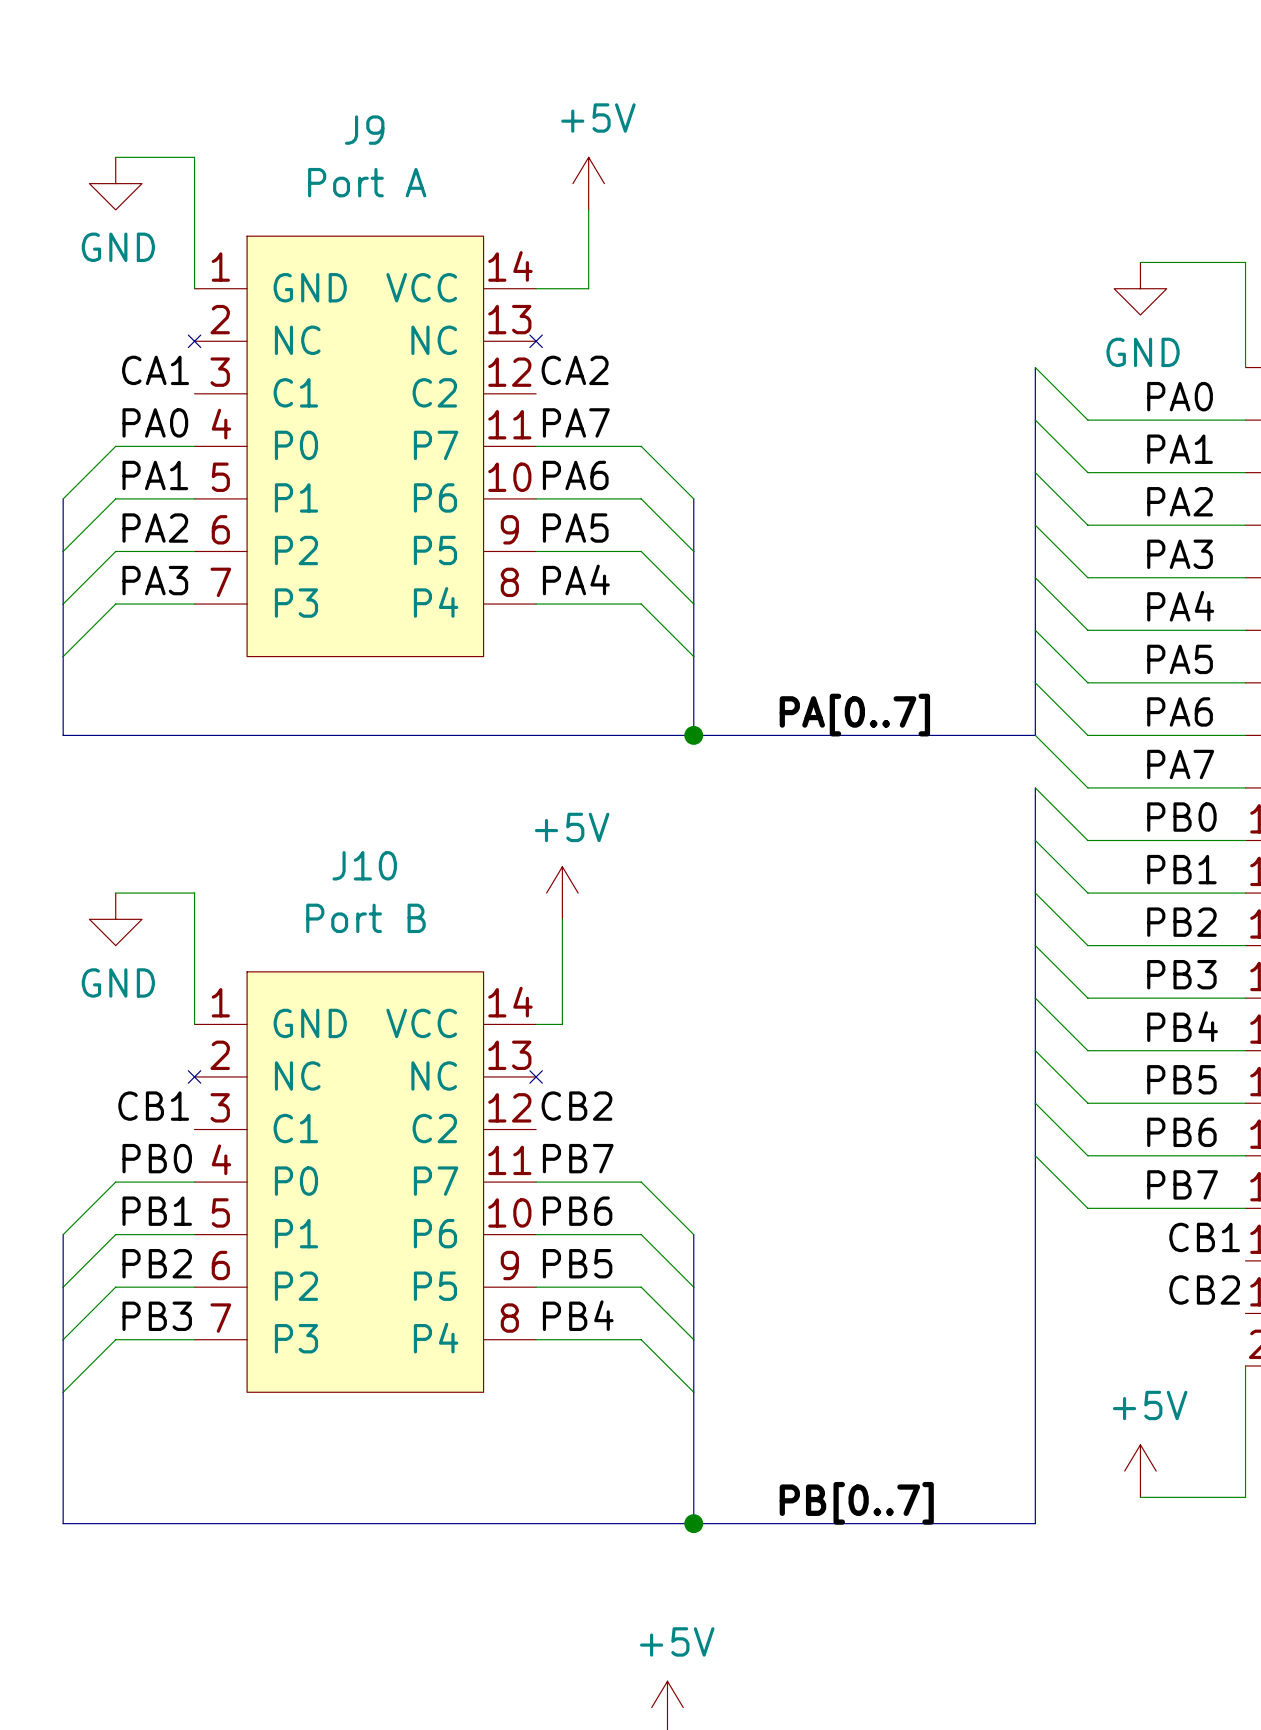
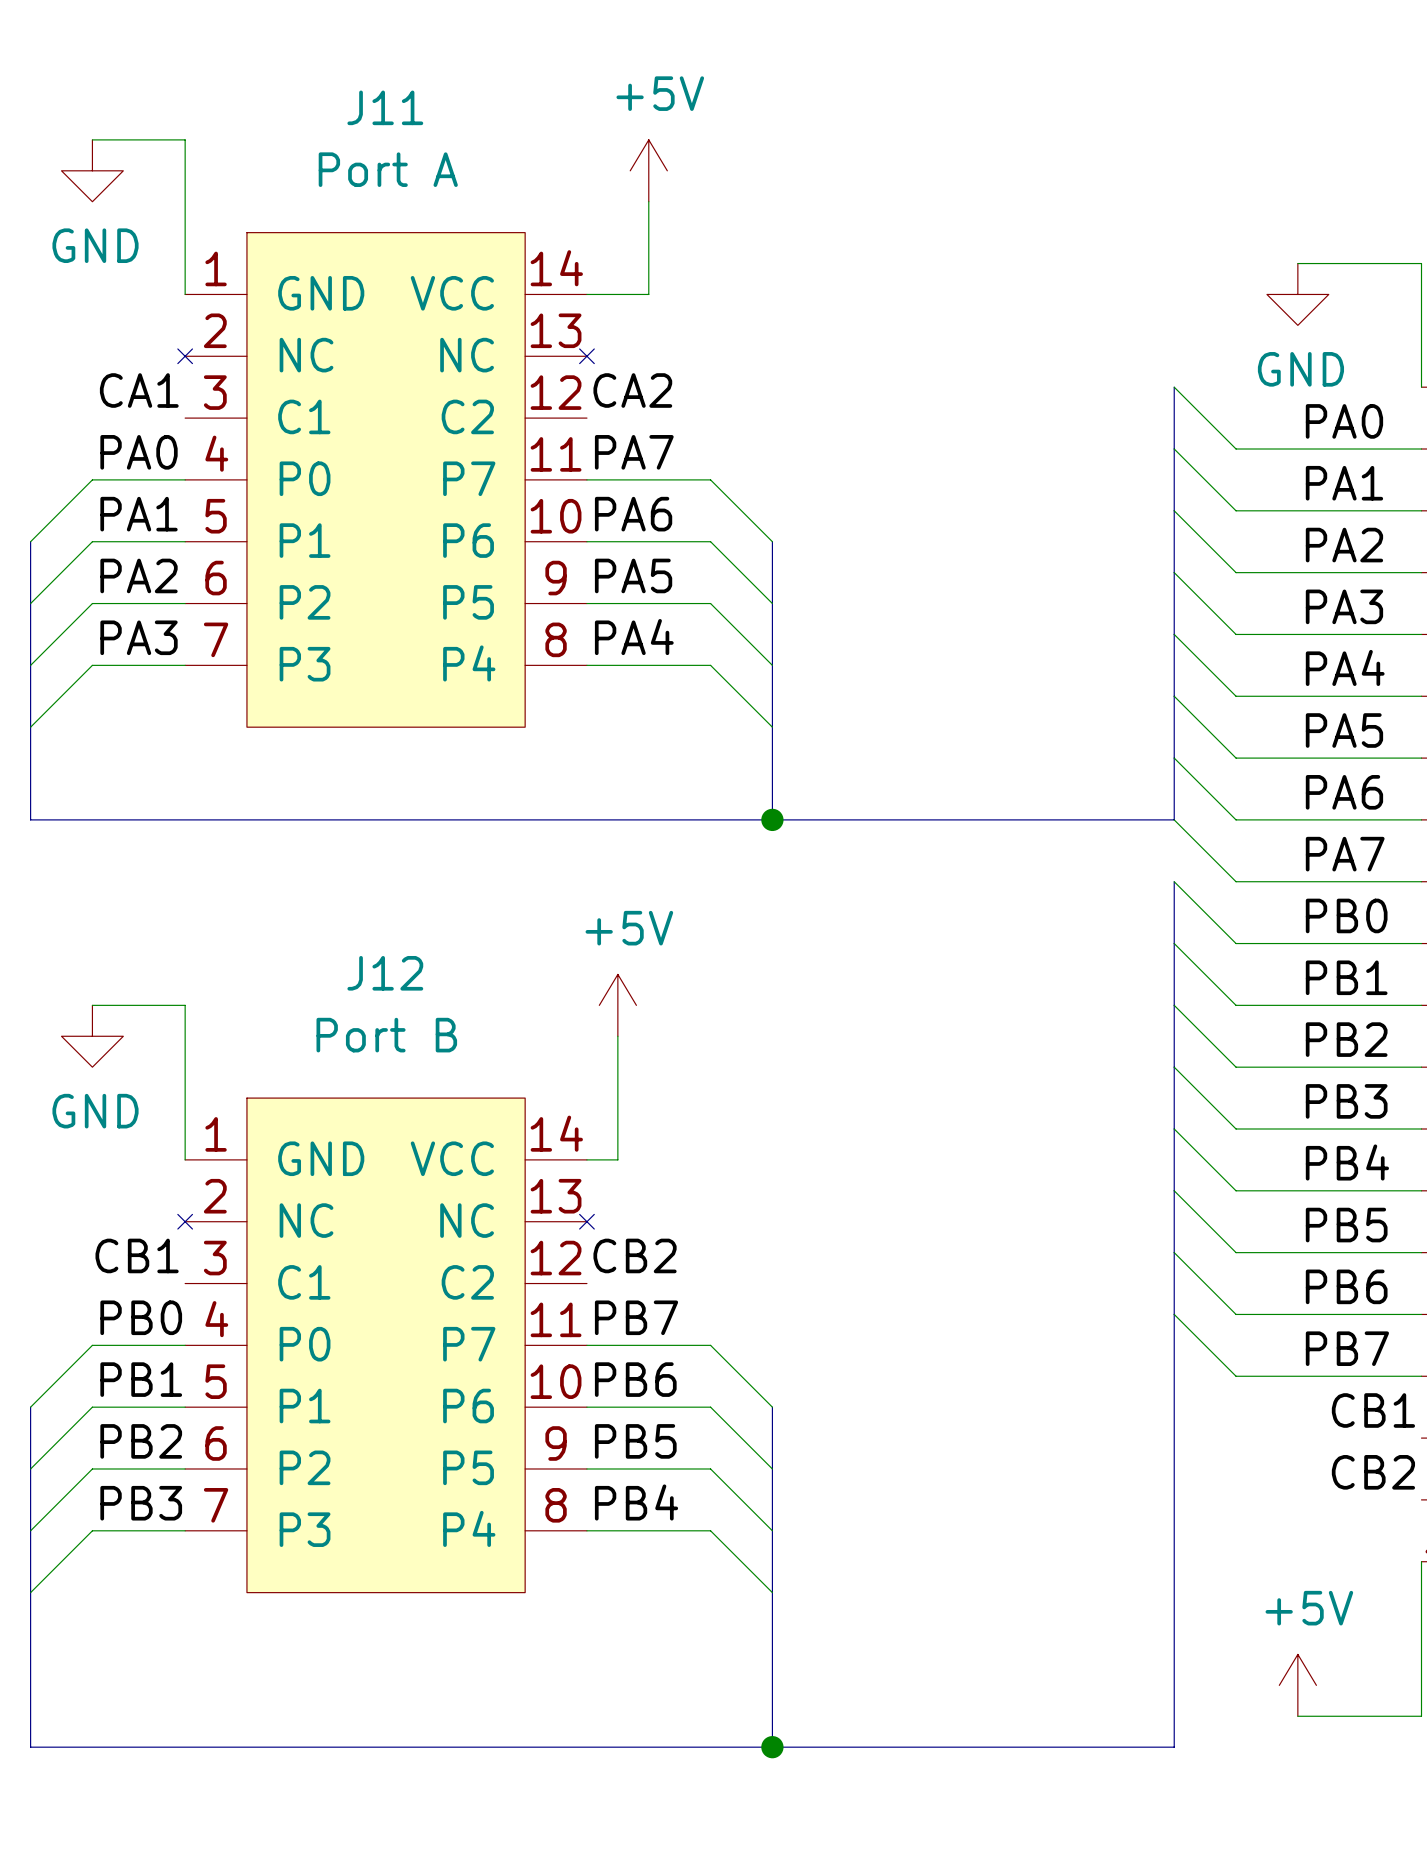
J9 name: J9 (364, 130) -> J11 (385, 107)
label: PA[0..7] (854, 715) -> none
J10 name: J10 (364, 865) -> J12 (385, 973)
label: PB[0..7] (856, 1503) -> none

